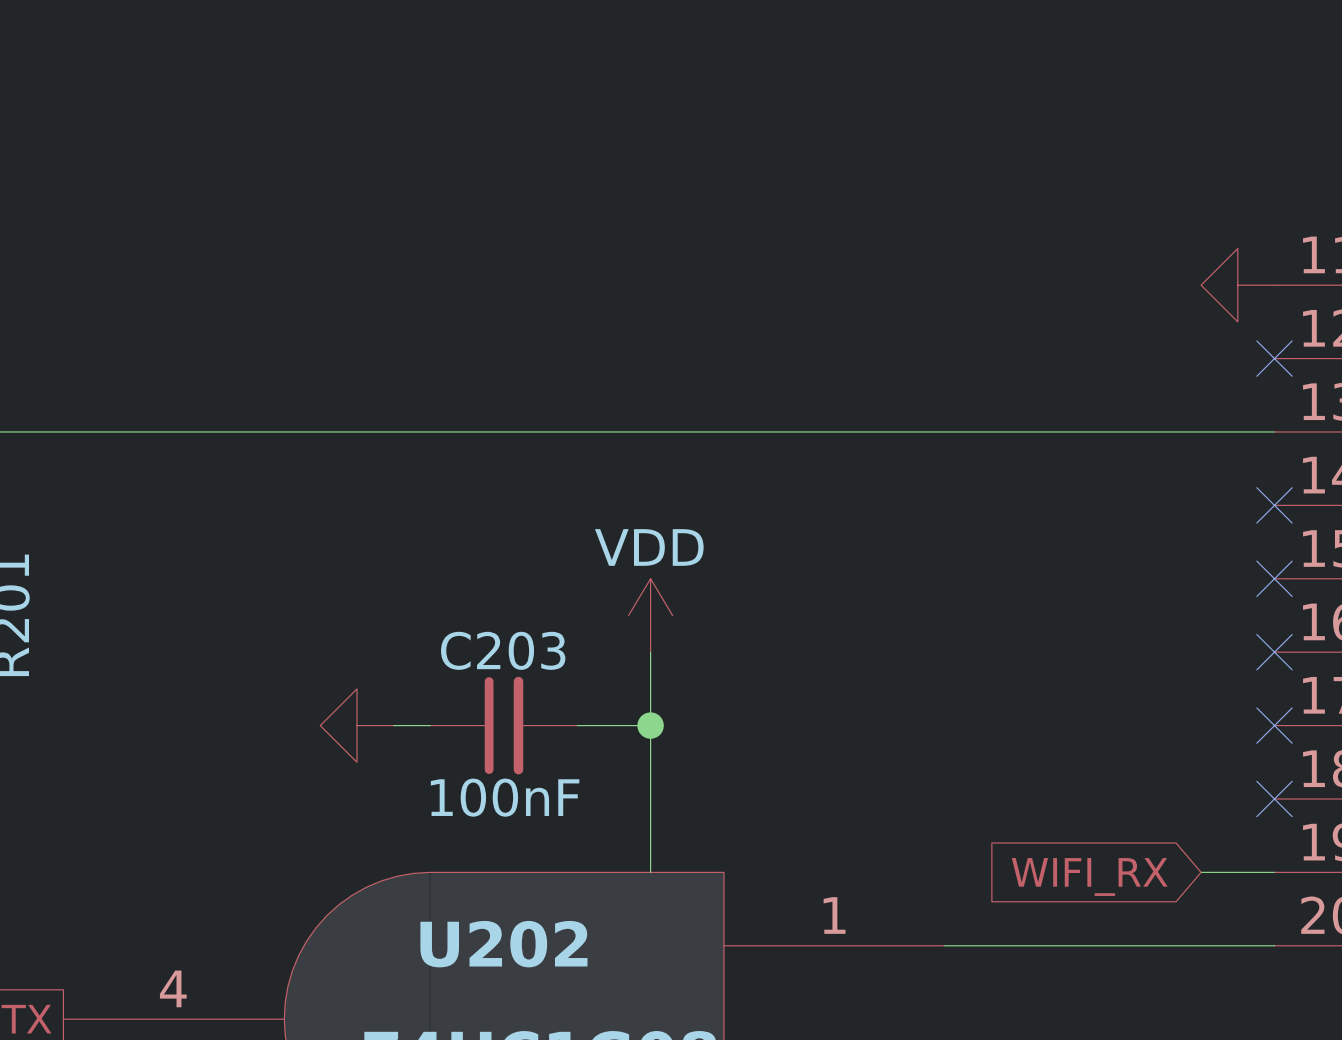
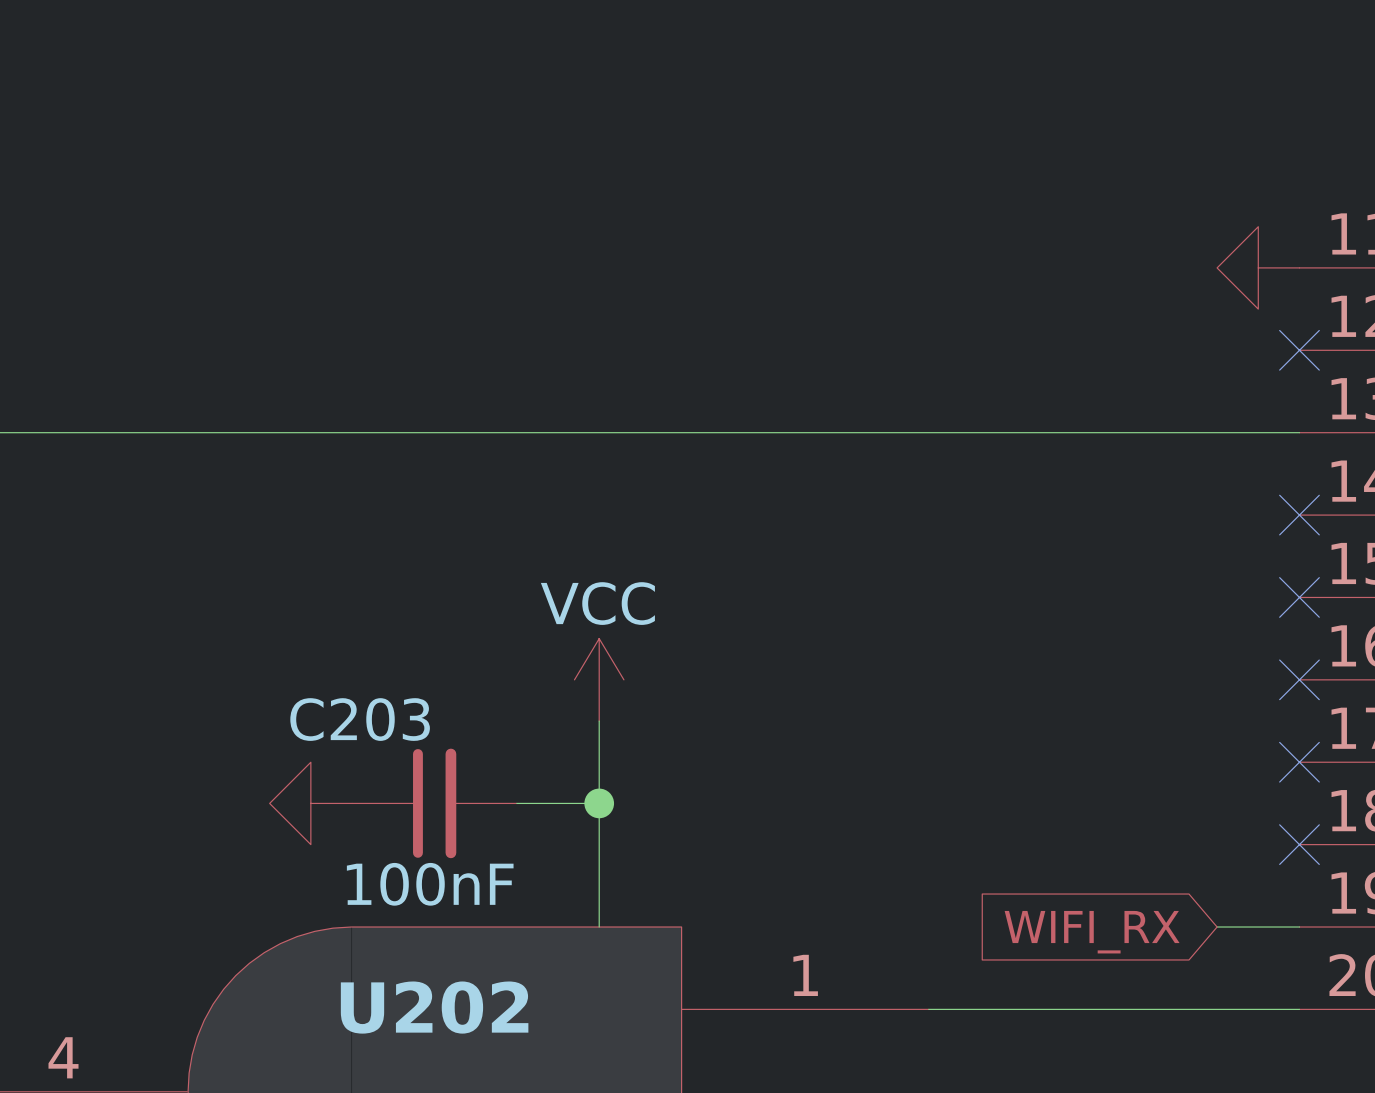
power symbol: VDD (650, 615) -> none
C203 name position: C203 (503, 650) -> C203 (360, 719)
power symbol: none -> VCC (599, 679)
power symbol position: (357, 725) -> (310, 803)
wire: (393, 725) (430, 725) -> none
C203 position: (503, 725) -> (434, 803)
wire: (577, 725) (650, 725) -> (516, 803) (599, 803)
junction position: (650, 725) -> (599, 803)
C203 value position: 100nF (505, 797) -> 100nF (430, 884)

